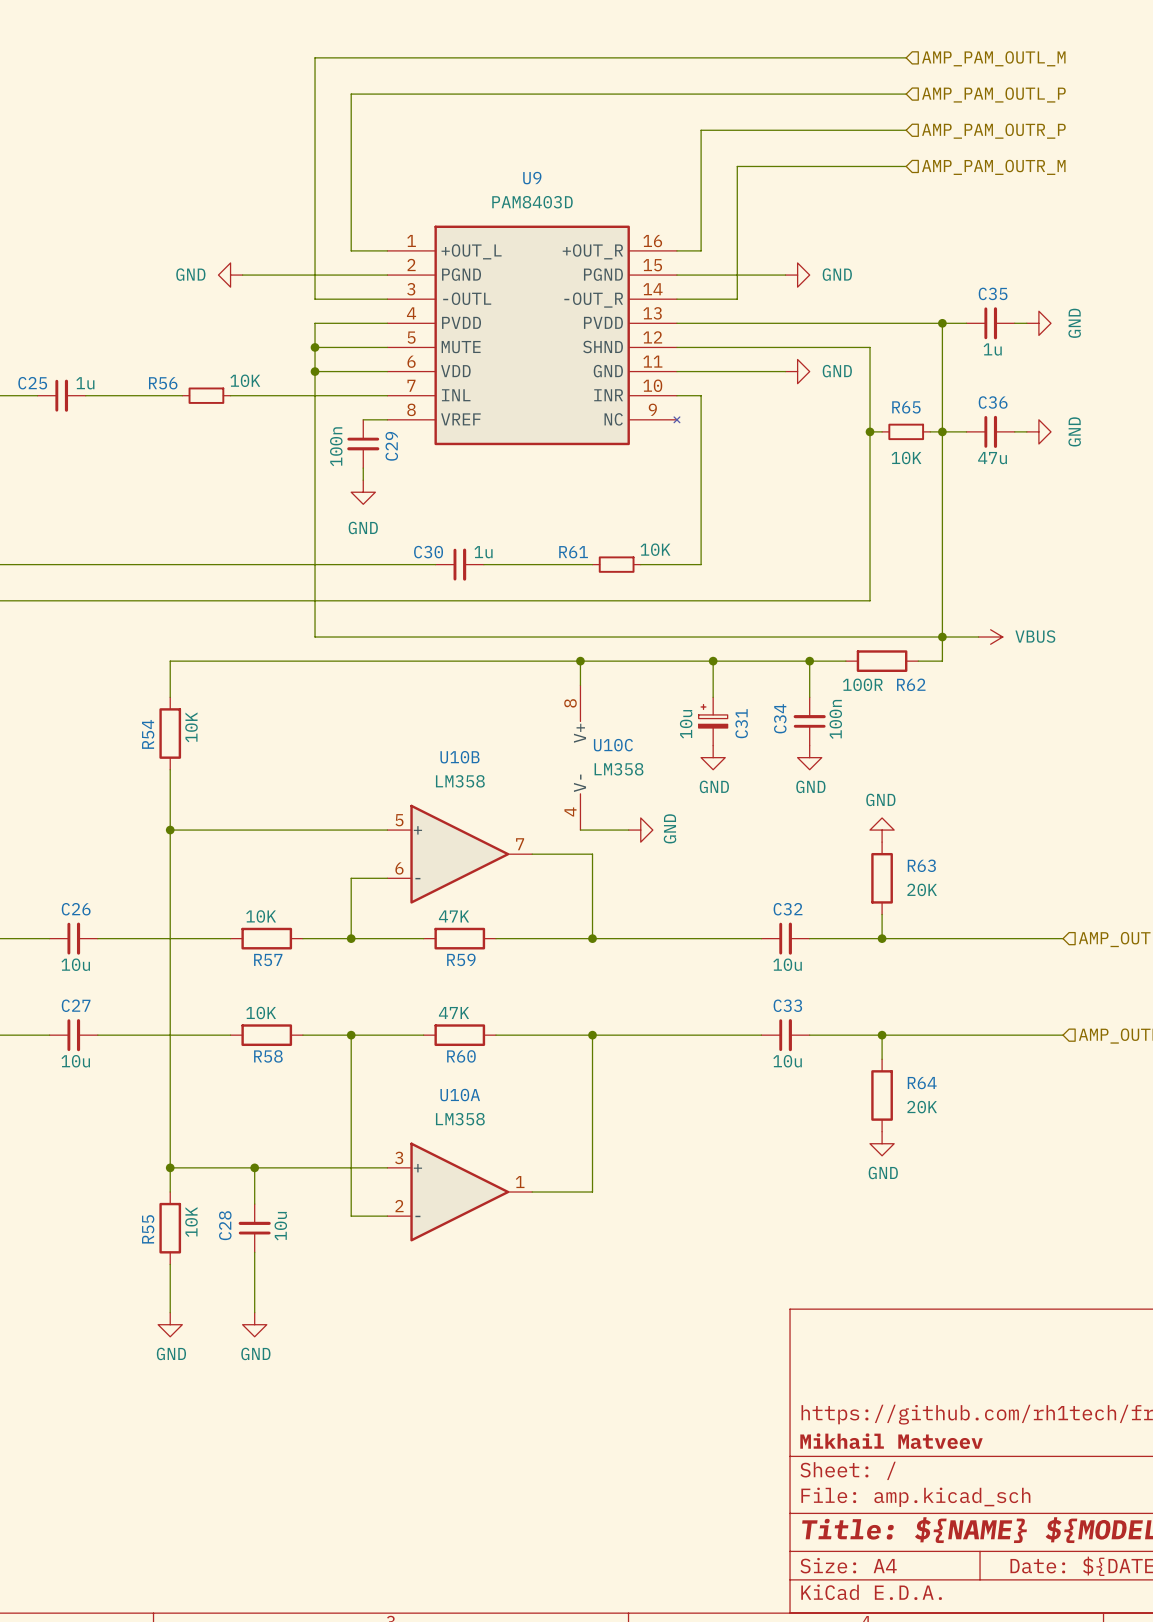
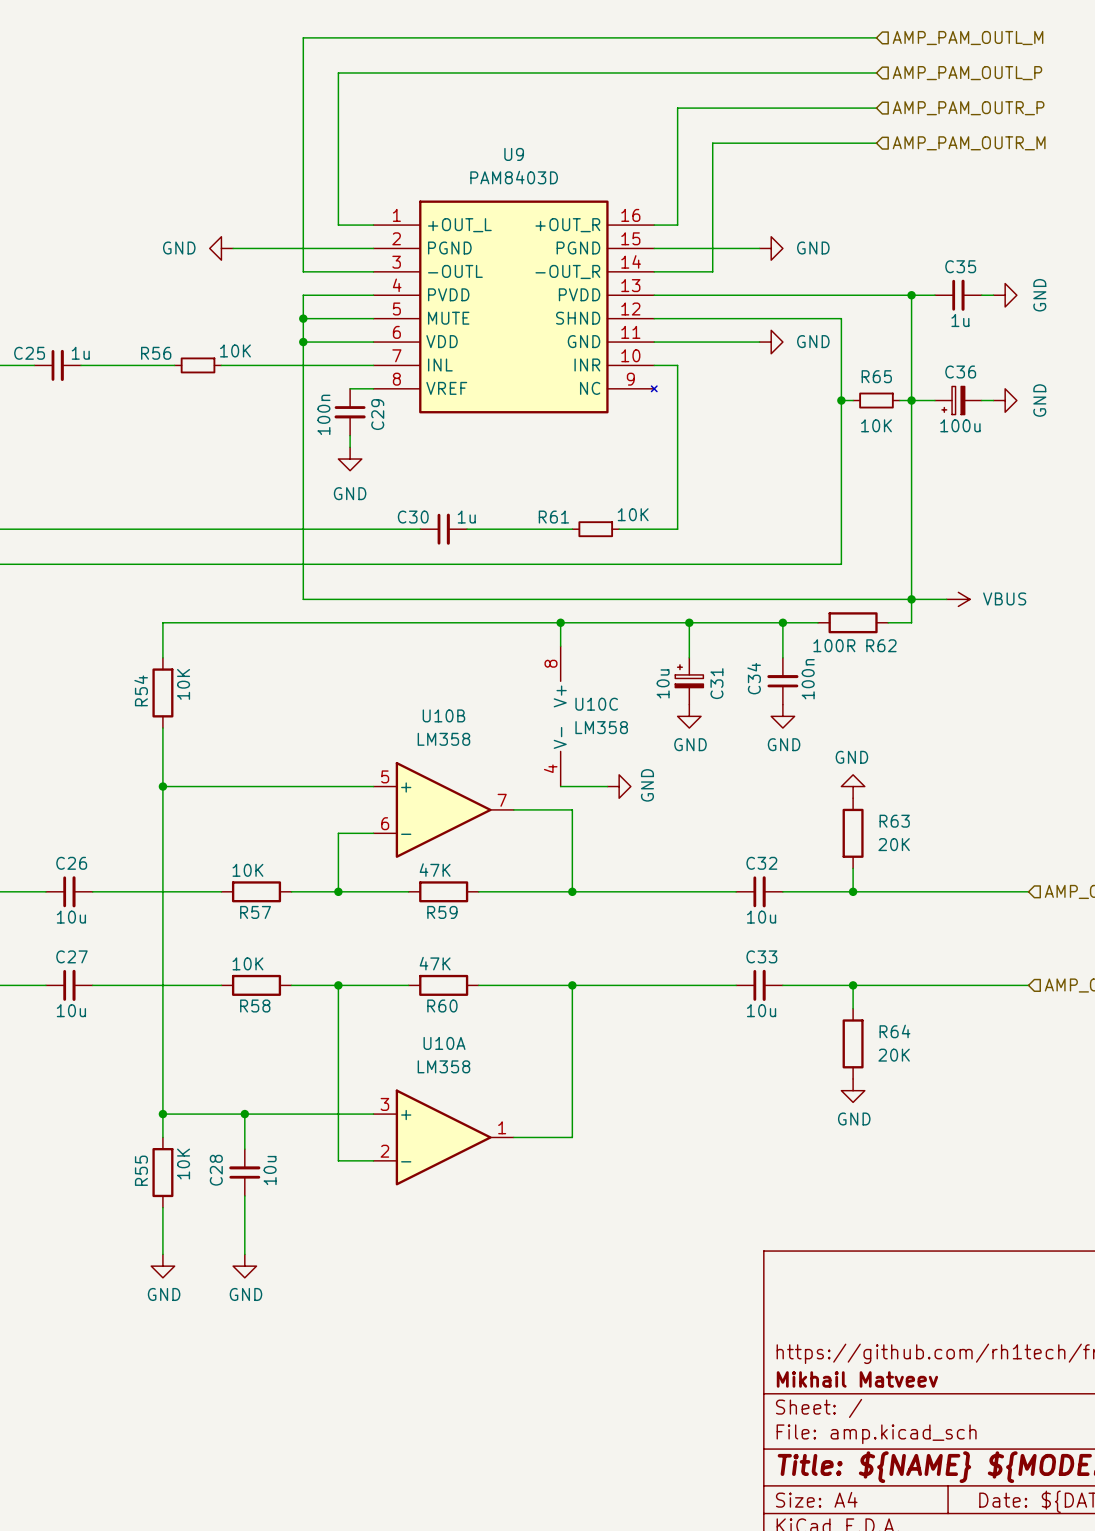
C36 symbol: [966, 415, 1015, 448] -> [934, 386, 982, 415]
C36 value: 47u (992, 458) -> 100u (960, 425)

